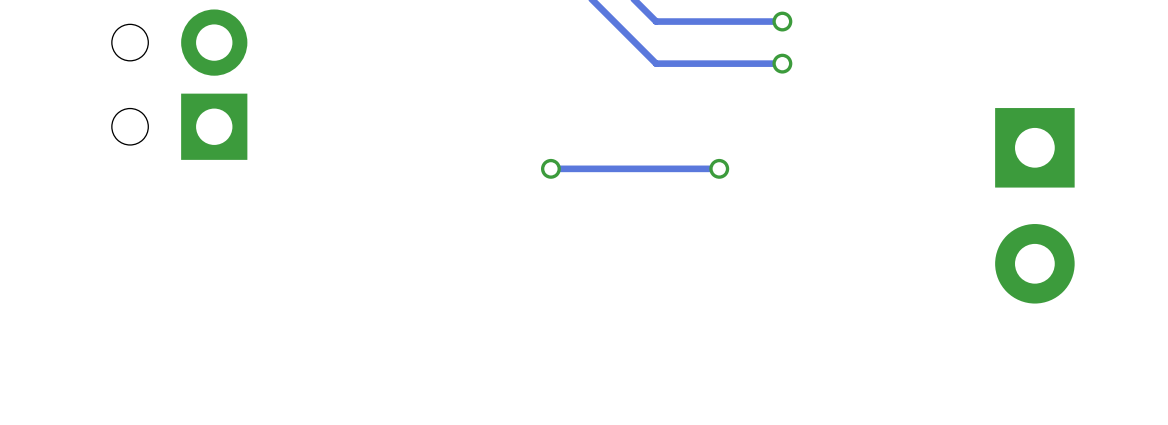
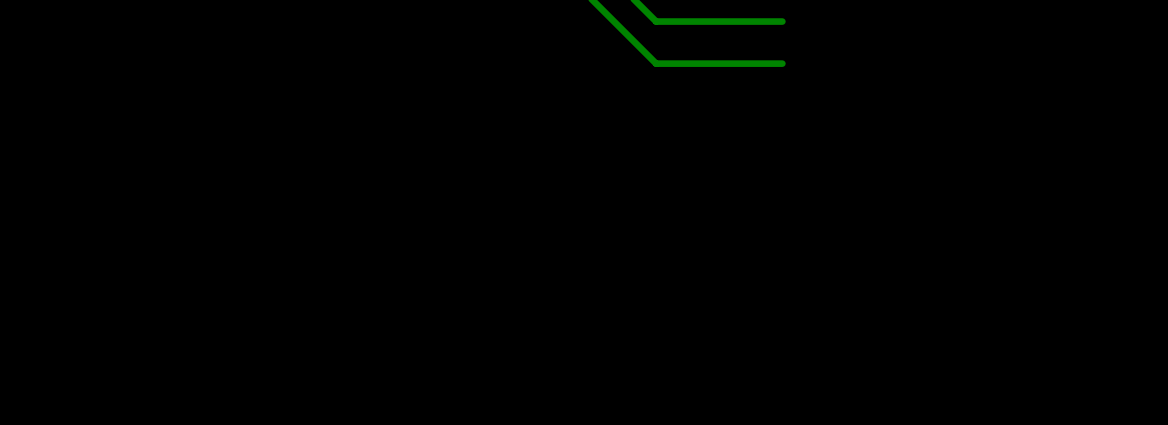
via: (782, 21) -> none
via: (782, 63) -> none
part: (179, 84) -> none
via: (550, 168) -> none
track: (719, 168) (550, 168) -> none
via: (719, 168) -> none
part: (1034, 205) -> none

